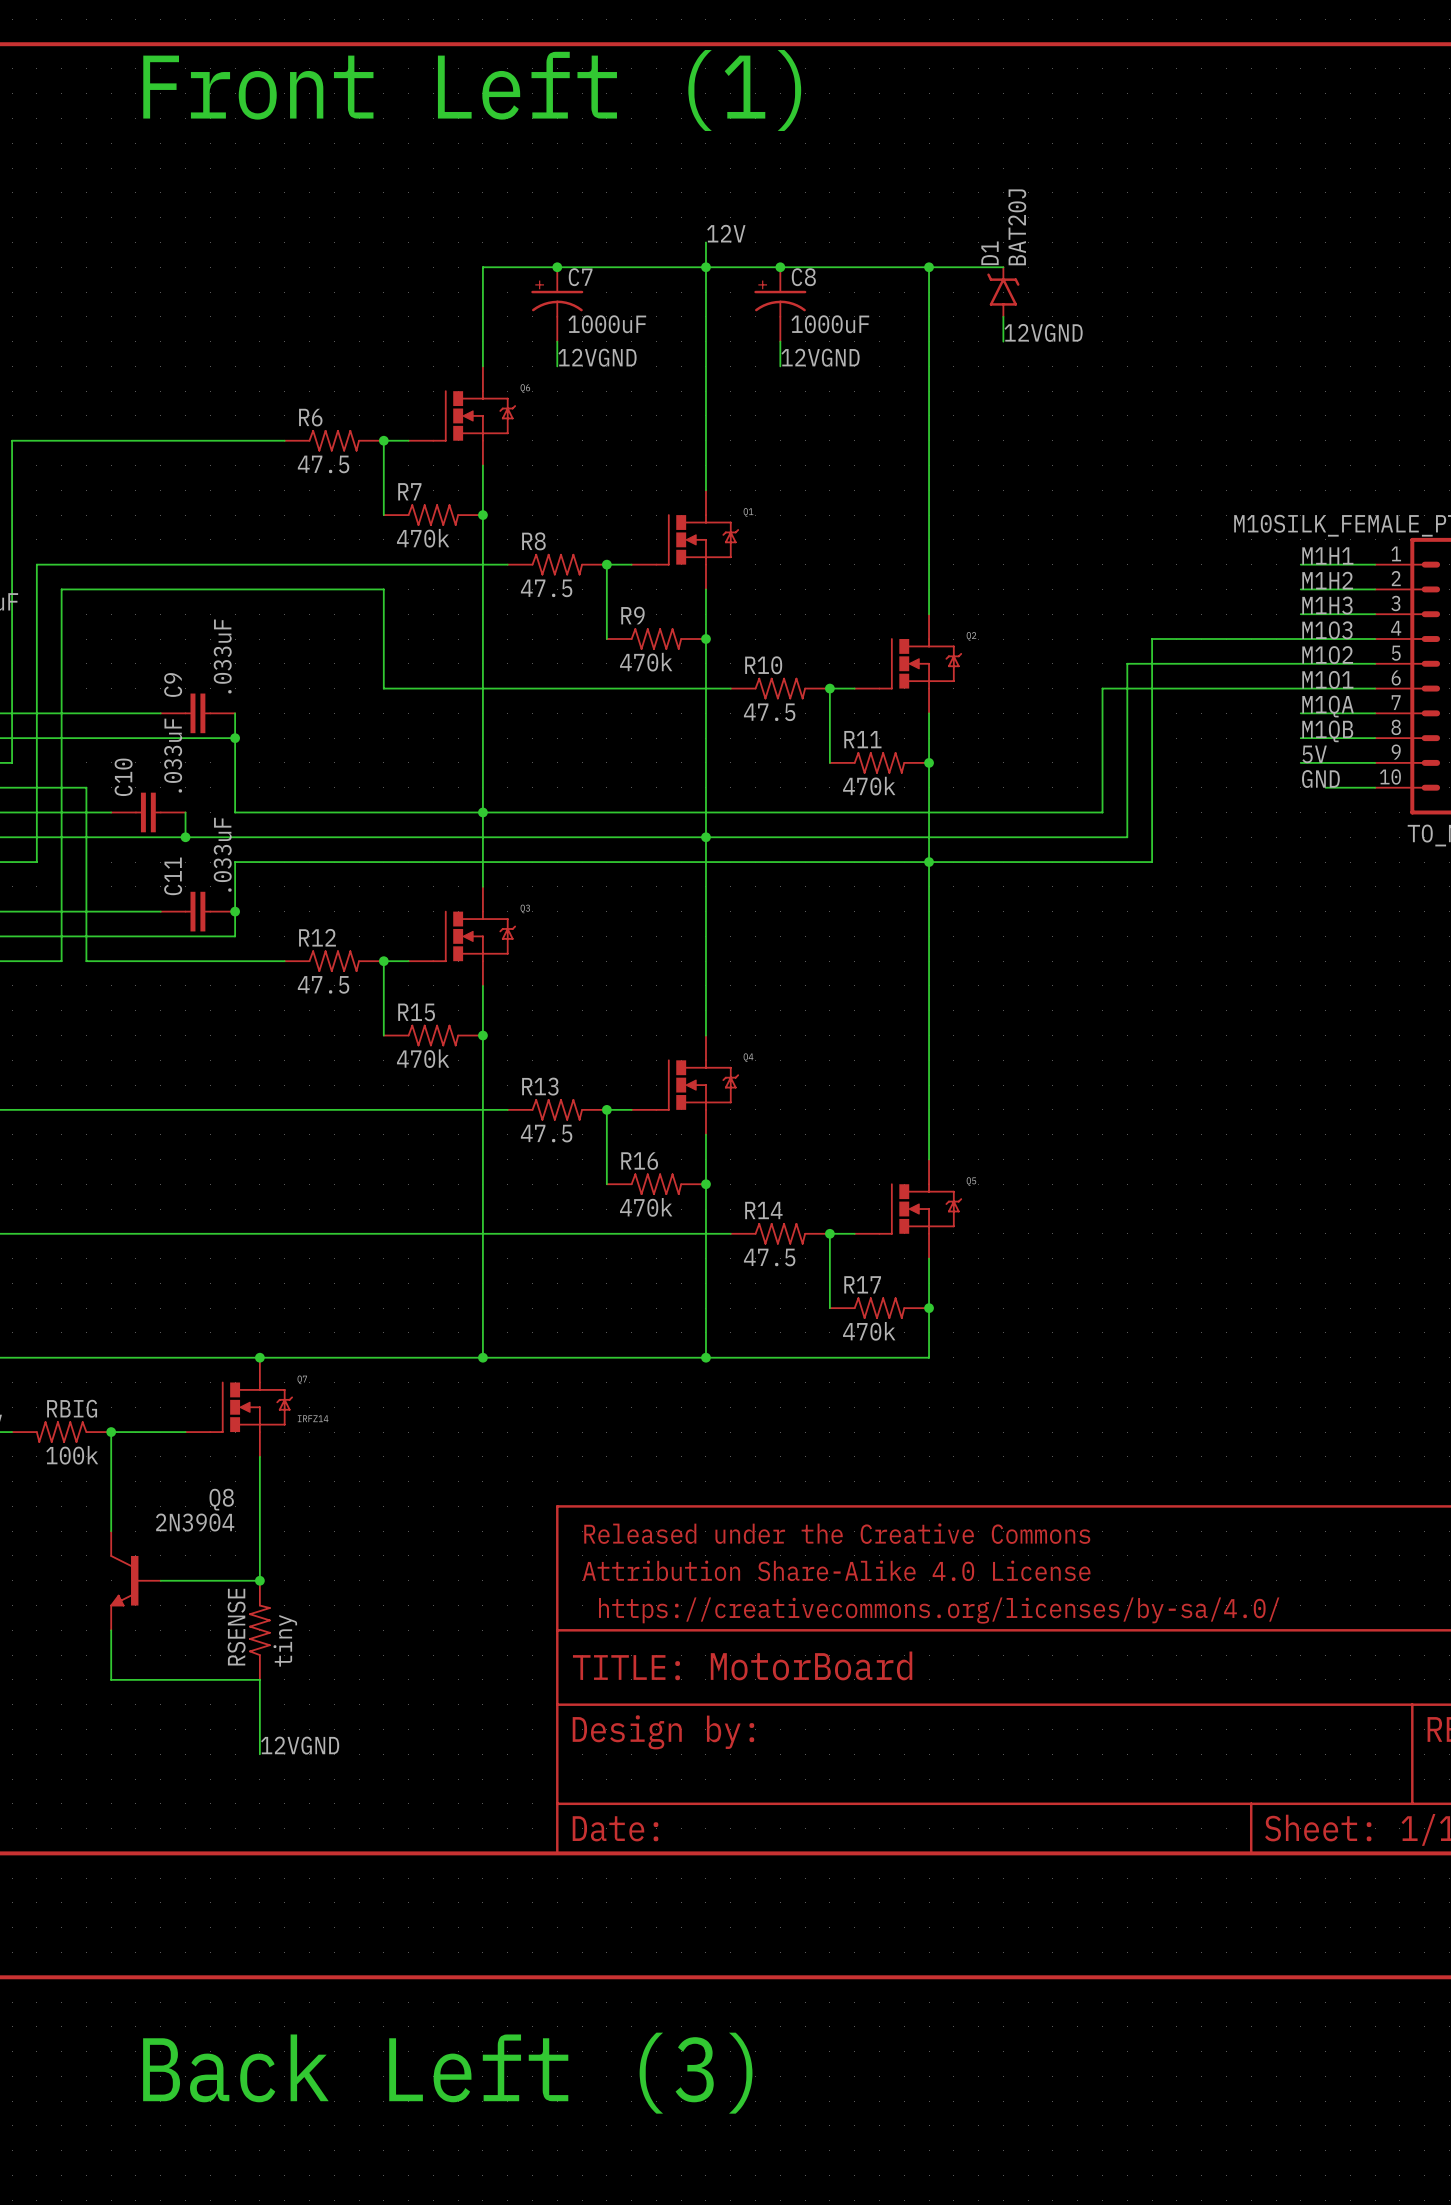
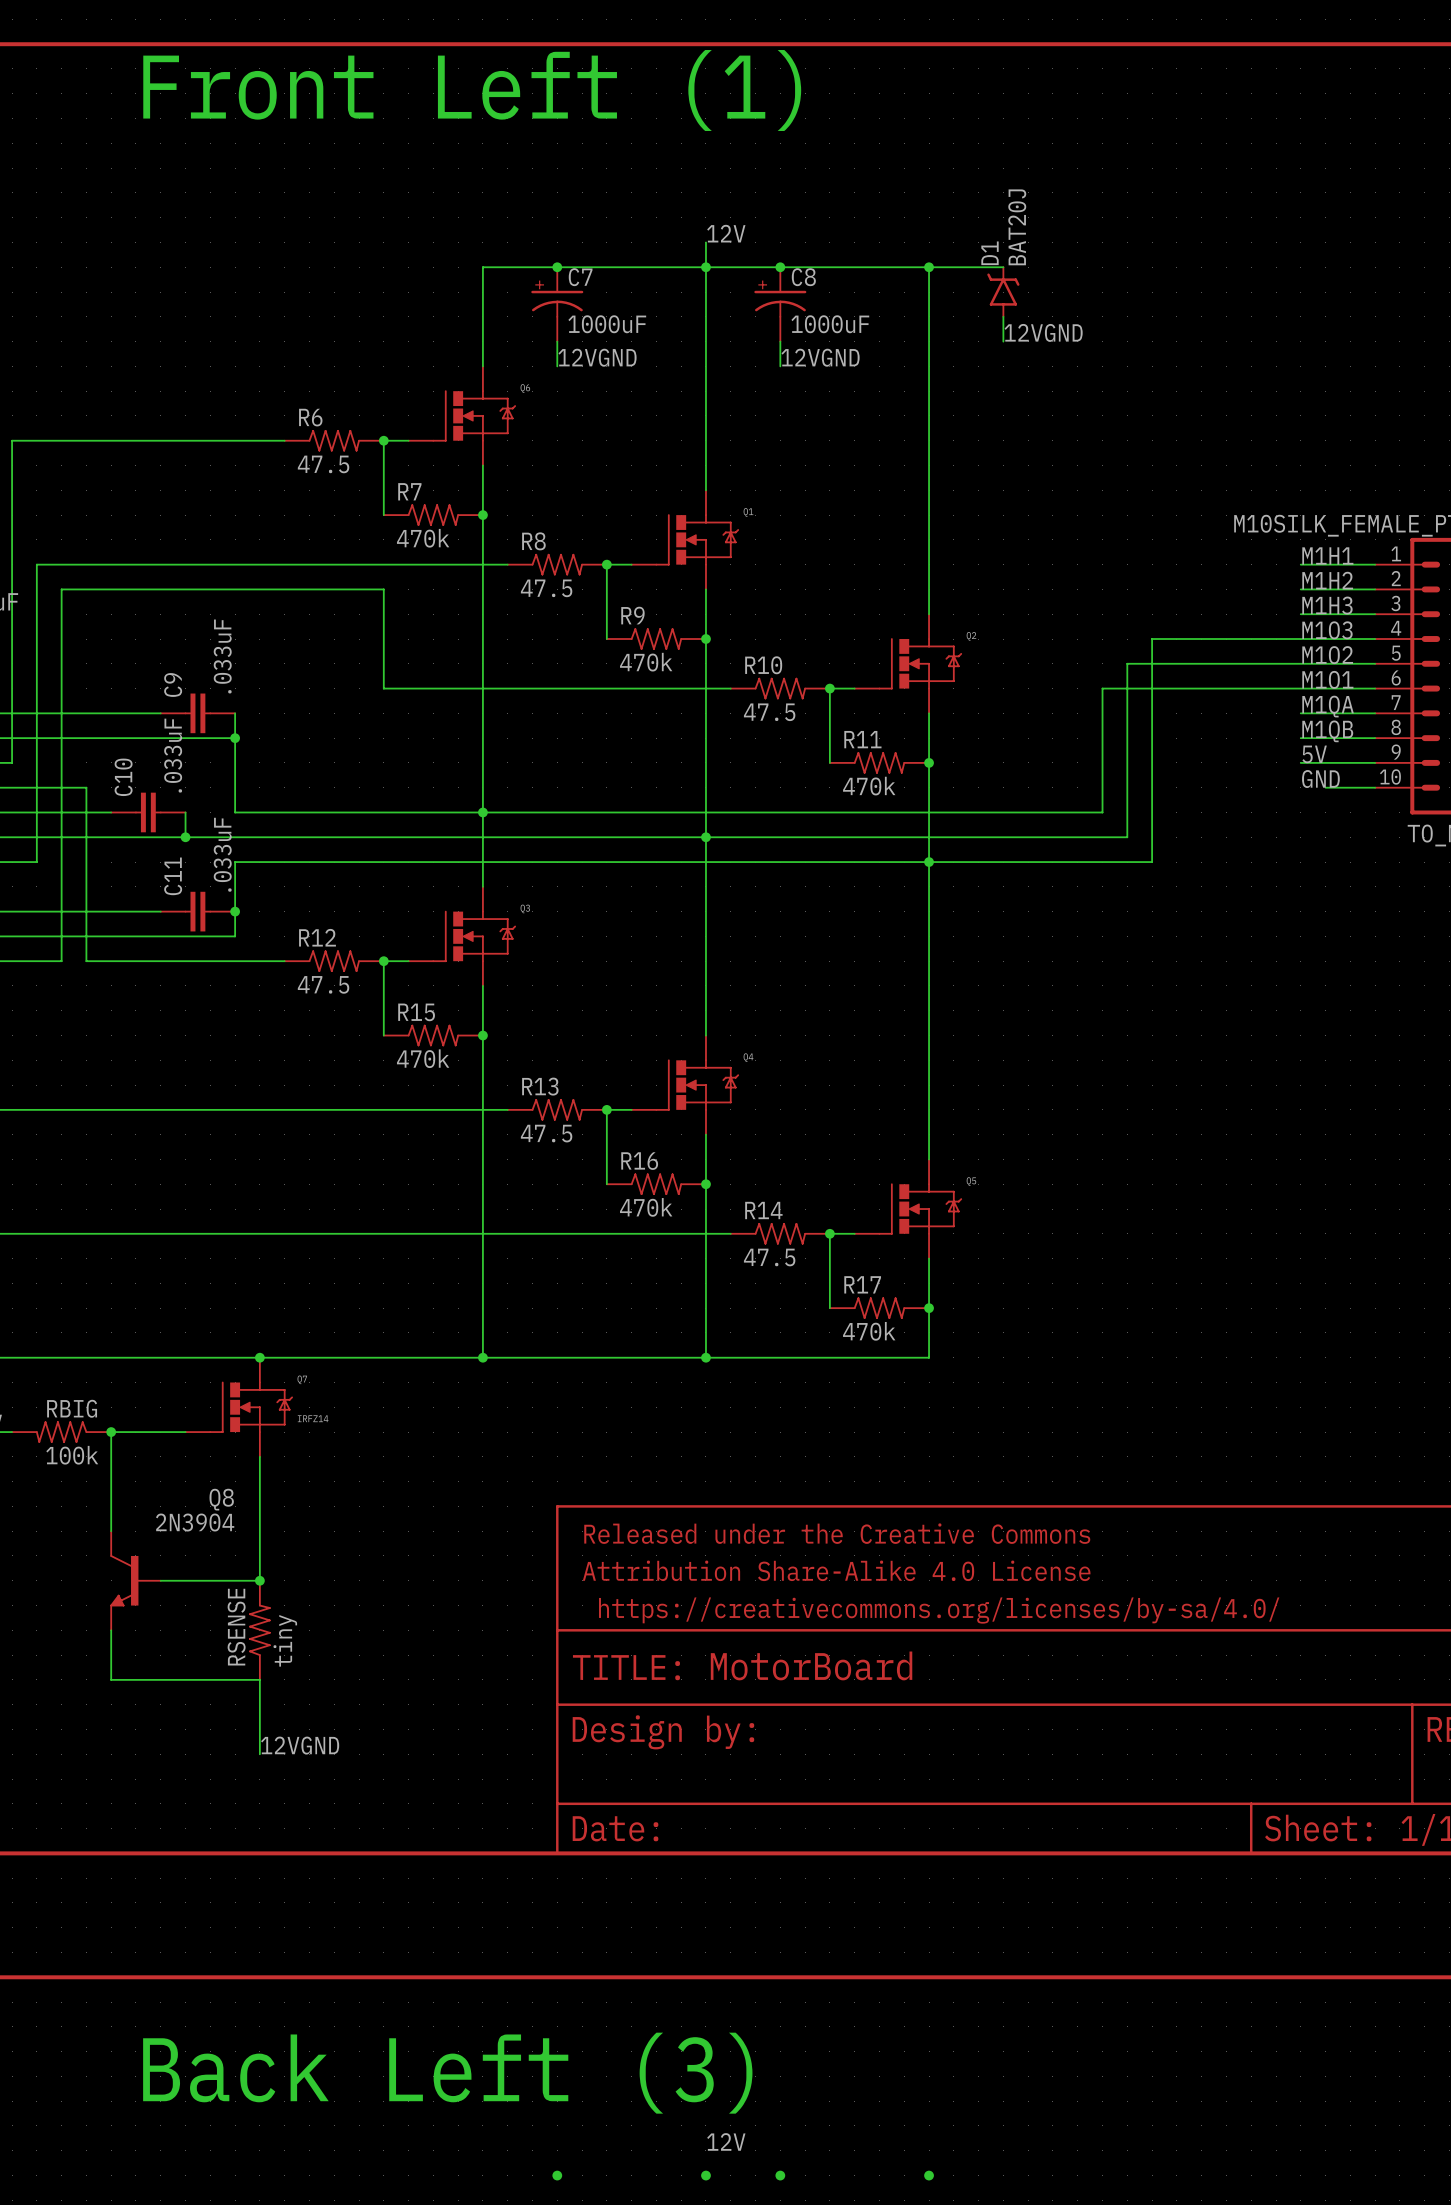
label: none -> 12V (726, 2141)
junction: none -> (557, 2175)
junction: none -> (705, 2175)
junction: none -> (780, 2175)
junction: none -> (929, 2175)

